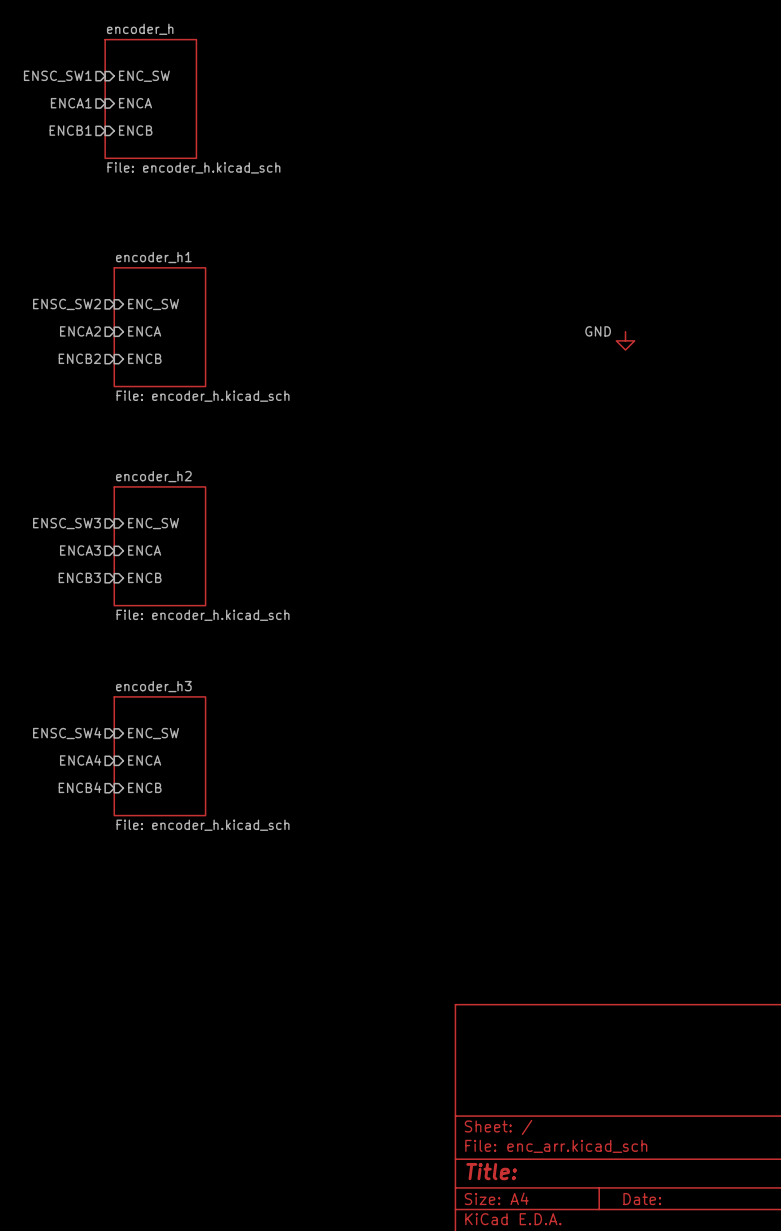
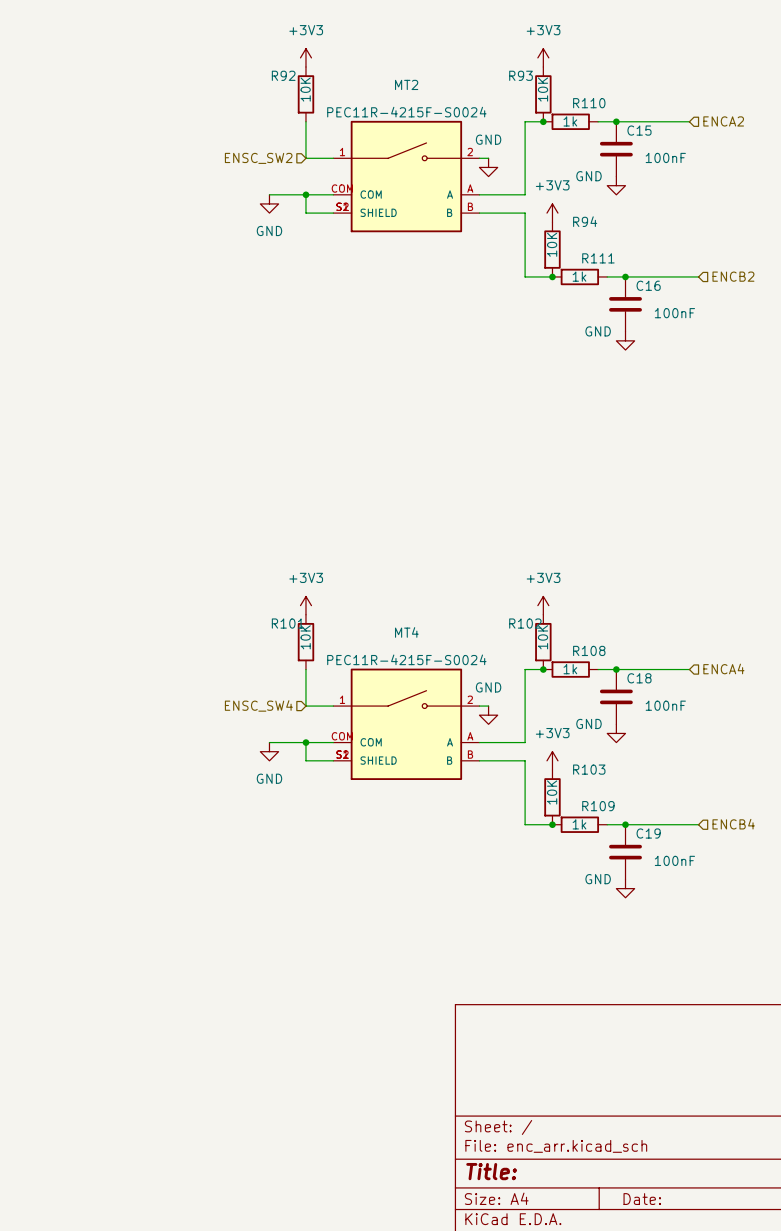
power symbol: none -> +3V3 (305, 57)
power symbol: none -> +3V3 (543, 57)
hierarchical label: ENSC_SW1 (57, 76) -> none
sheet pin: ENC_SW (144, 76) -> none
R92: none -> 10K (305, 94)
R93: none -> 10K (543, 94)
sheet encoder_h: File: encoder_h.kicad_sch (150, 98) -> none
hierarchical label: ENCA1 (71, 103) -> none
sheet pin: ENCA (135, 103) -> none
wire: none -> (305, 121) (305, 158) (333, 158)
wire: none -> (543, 121) (525, 121) (525, 194) (479, 194)
junction: none -> (543, 121)
R110: none -> 1k (570, 121)
wire: none -> (598, 121) (689, 121)
junction: none -> (616, 121)
hierarchical label: none -> ENCA2 (723, 121)
hierarchical label: ENCB1 (70, 130) -> none
sheet pin: ENCB (135, 130) -> none
C15: none -> 100nF (616, 149)
hierarchical label: none -> ENSC_SW2 (258, 158)
wire: none -> (479, 158) (488, 158)
power symbol: none -> GND (488, 167)
MT2: none -> PEC11R-4215F-S0024 (406, 176)
power symbol: none -> GND (616, 185)
wire: none -> (269, 194) (333, 194)
wire: none -> (305, 194) (305, 213) (333, 213)
junction: none -> (305, 194)
power symbol: none -> GND (269, 203)
wire: none -> (479, 213) (525, 213) (525, 276) (552, 276)
power symbol: none -> +3V3 (552, 213)
R94: none -> 10K (552, 249)
junction: none -> (552, 276)
R111: none -> 1k (579, 276)
wire: none -> (607, 276) (698, 276)
junction: none -> (625, 276)
hierarchical label: none -> ENCB2 (733, 276)
hierarchical label: ENSC_SW2 (66, 304) -> none
sheet pin: ENC_SW (153, 304) -> none
C16: none -> 100nF (625, 304)
sheet encoder_h1: File: encoder_h.kicad_sch (159, 327) -> none
hierarchical label: ENCA2 (80, 331) -> none
sheet pin: ENCA (144, 331) -> none
hierarchical label: ENCB2 (79, 358) -> none
sheet pin: ENCB (144, 358) -> none
hierarchical label: ENSC_SW3 (66, 523) -> none
sheet pin: ENC_SW (153, 523) -> none
sheet encoder_h2: File: encoder_h.kicad_sch (159, 546) -> none
hierarchical label: ENCA3 (80, 550) -> none
sheet pin: ENCA (144, 550) -> none
hierarchical label: ENCB3 (79, 577) -> none
sheet pin: ENCB (144, 577) -> none
power symbol: none -> +3V3 (305, 605)
power symbol: none -> +3V3 (543, 605)
R101: none -> 10K (305, 642)
R102: none -> 10K (543, 642)
hierarchical label: none -> ENCA4 (723, 668)
wire: none -> (305, 669) (305, 706) (333, 706)
wire: none -> (543, 669) (525, 669) (525, 742) (479, 742)
junction: none -> (543, 669)
R108: none -> 1k (570, 669)
wire: none -> (598, 669) (689, 669)
junction: none -> (616, 669)
C18: none -> 100nF (616, 696)
hierarchical label: none -> ENSC_SW4 (258, 705)
wire: none -> (479, 706) (488, 706)
power symbol: none -> GND (488, 715)
MT4: none -> PEC11R-4215F-S0024 (406, 724)
hierarchical label: ENSC_SW4 (67, 733) -> none
sheet pin: ENC_SW (153, 733) -> none
power symbol: none -> GND (616, 733)
wire: none -> (269, 742) (333, 742)
wire: none -> (305, 742) (305, 760) (333, 760)
junction: none -> (305, 742)
power symbol: none -> GND (269, 751)
sheet encoder_h3: File: encoder_h.kicad_sch (159, 756) -> none
hierarchical label: ENCA4 (80, 760) -> none
sheet pin: ENCA (144, 760) -> none
wire: none -> (479, 760) (525, 760) (525, 824) (552, 824)
power symbol: none -> +3V3 (552, 760)
hierarchical label: ENCB4 (80, 787) -> none
sheet pin: ENCB (144, 787) -> none
R103: none -> 10K (552, 797)
junction: none -> (552, 824)
R109: none -> 1k (579, 824)
wire: none -> (607, 824) (698, 824)
junction: none -> (625, 824)
hierarchical label: none -> ENCB4 (733, 824)
C19: none -> 100nF (625, 852)
power symbol: none -> GND (625, 888)

